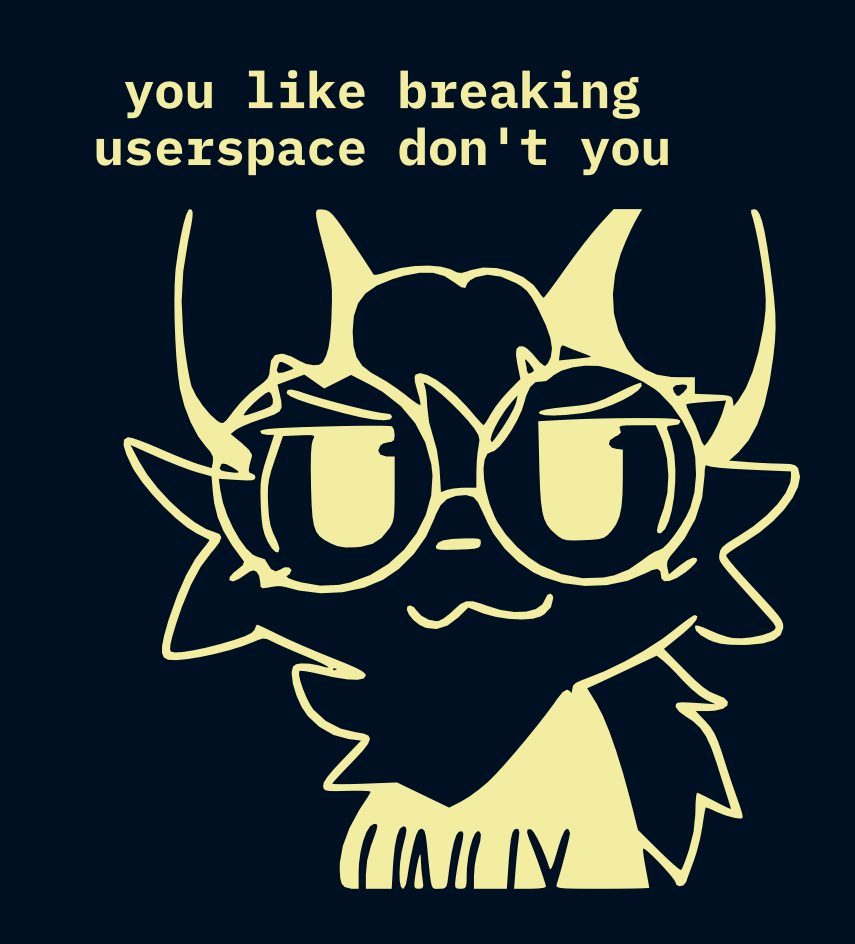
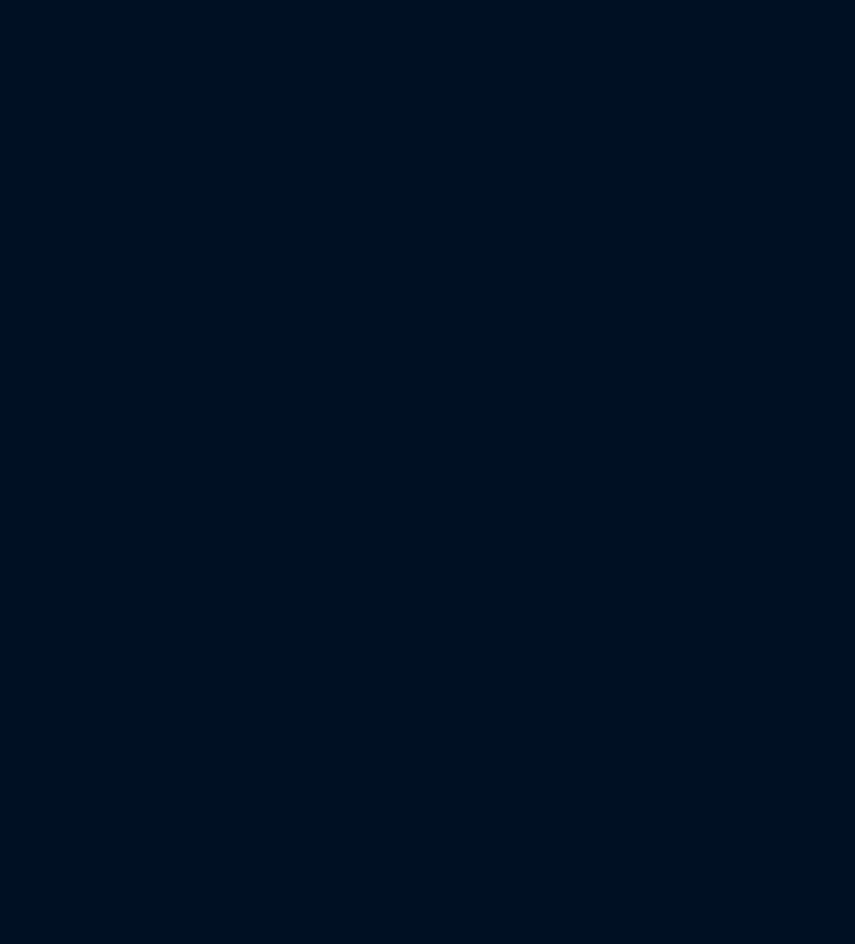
text: you like breaking (382, 94) -> none
text: userspace don't you (382, 151) -> none
drawing: [123, 209, 801, 889] -> none

